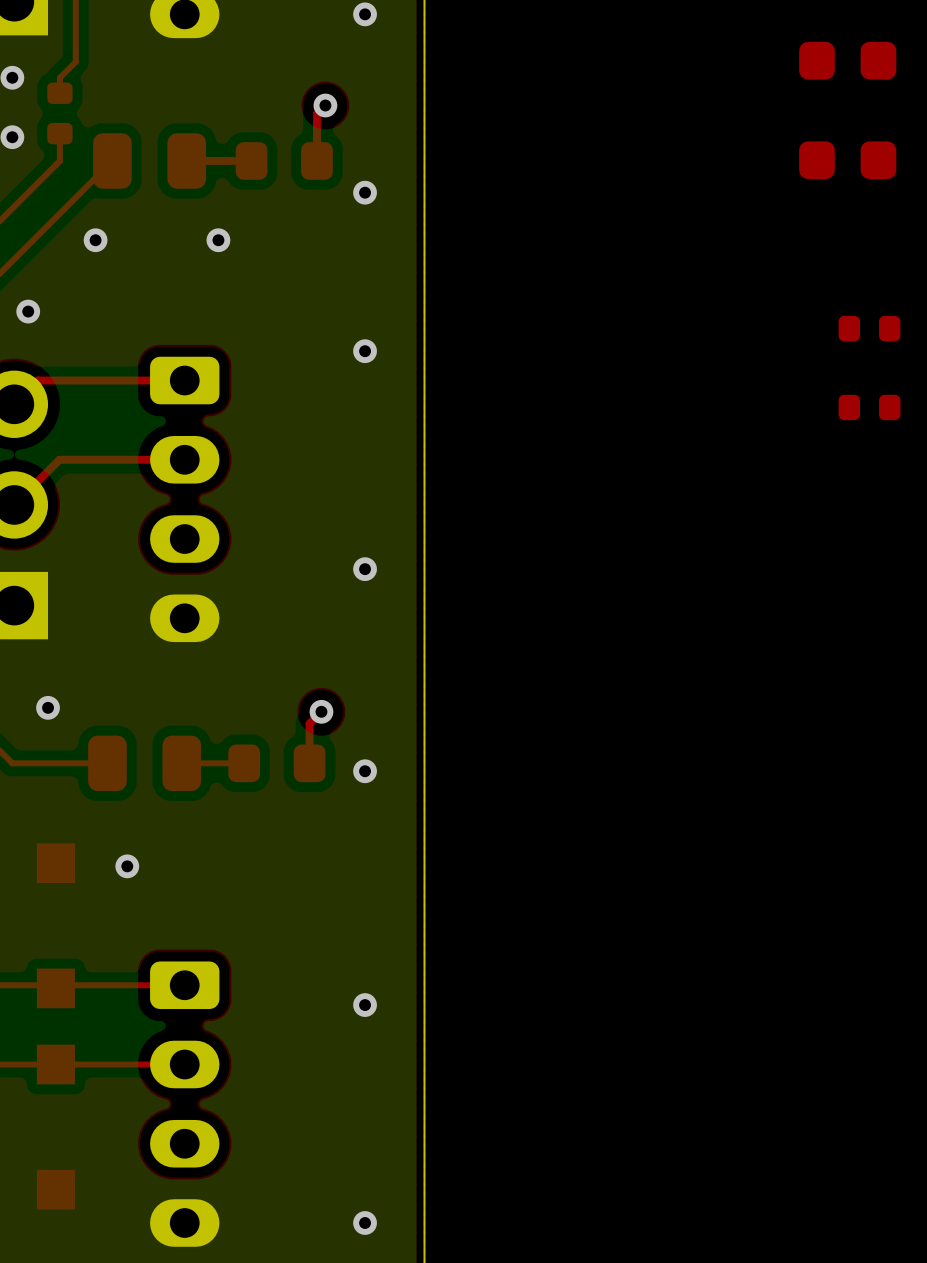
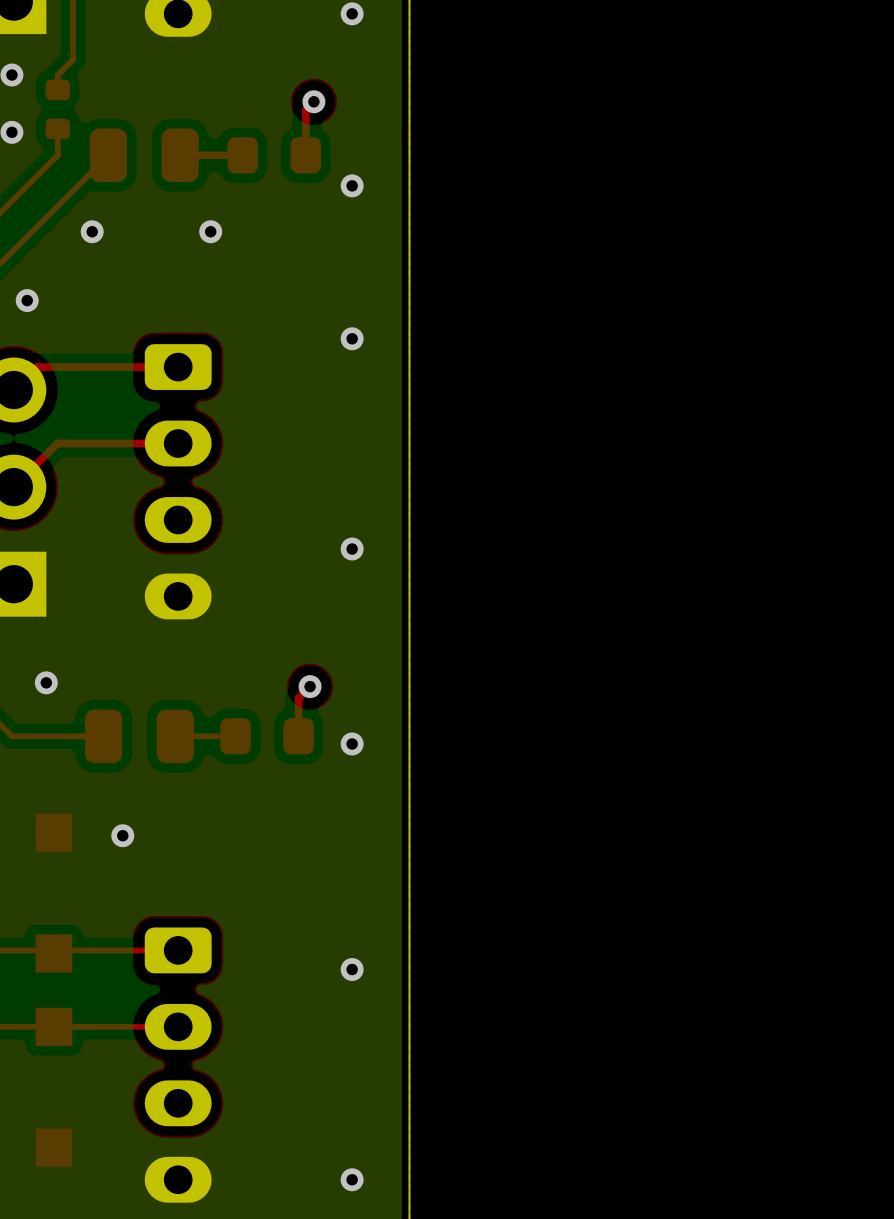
part: (847, 60) -> none
part: (847, 160) -> none
part: (869, 328) -> none
part: (869, 407) -> none

